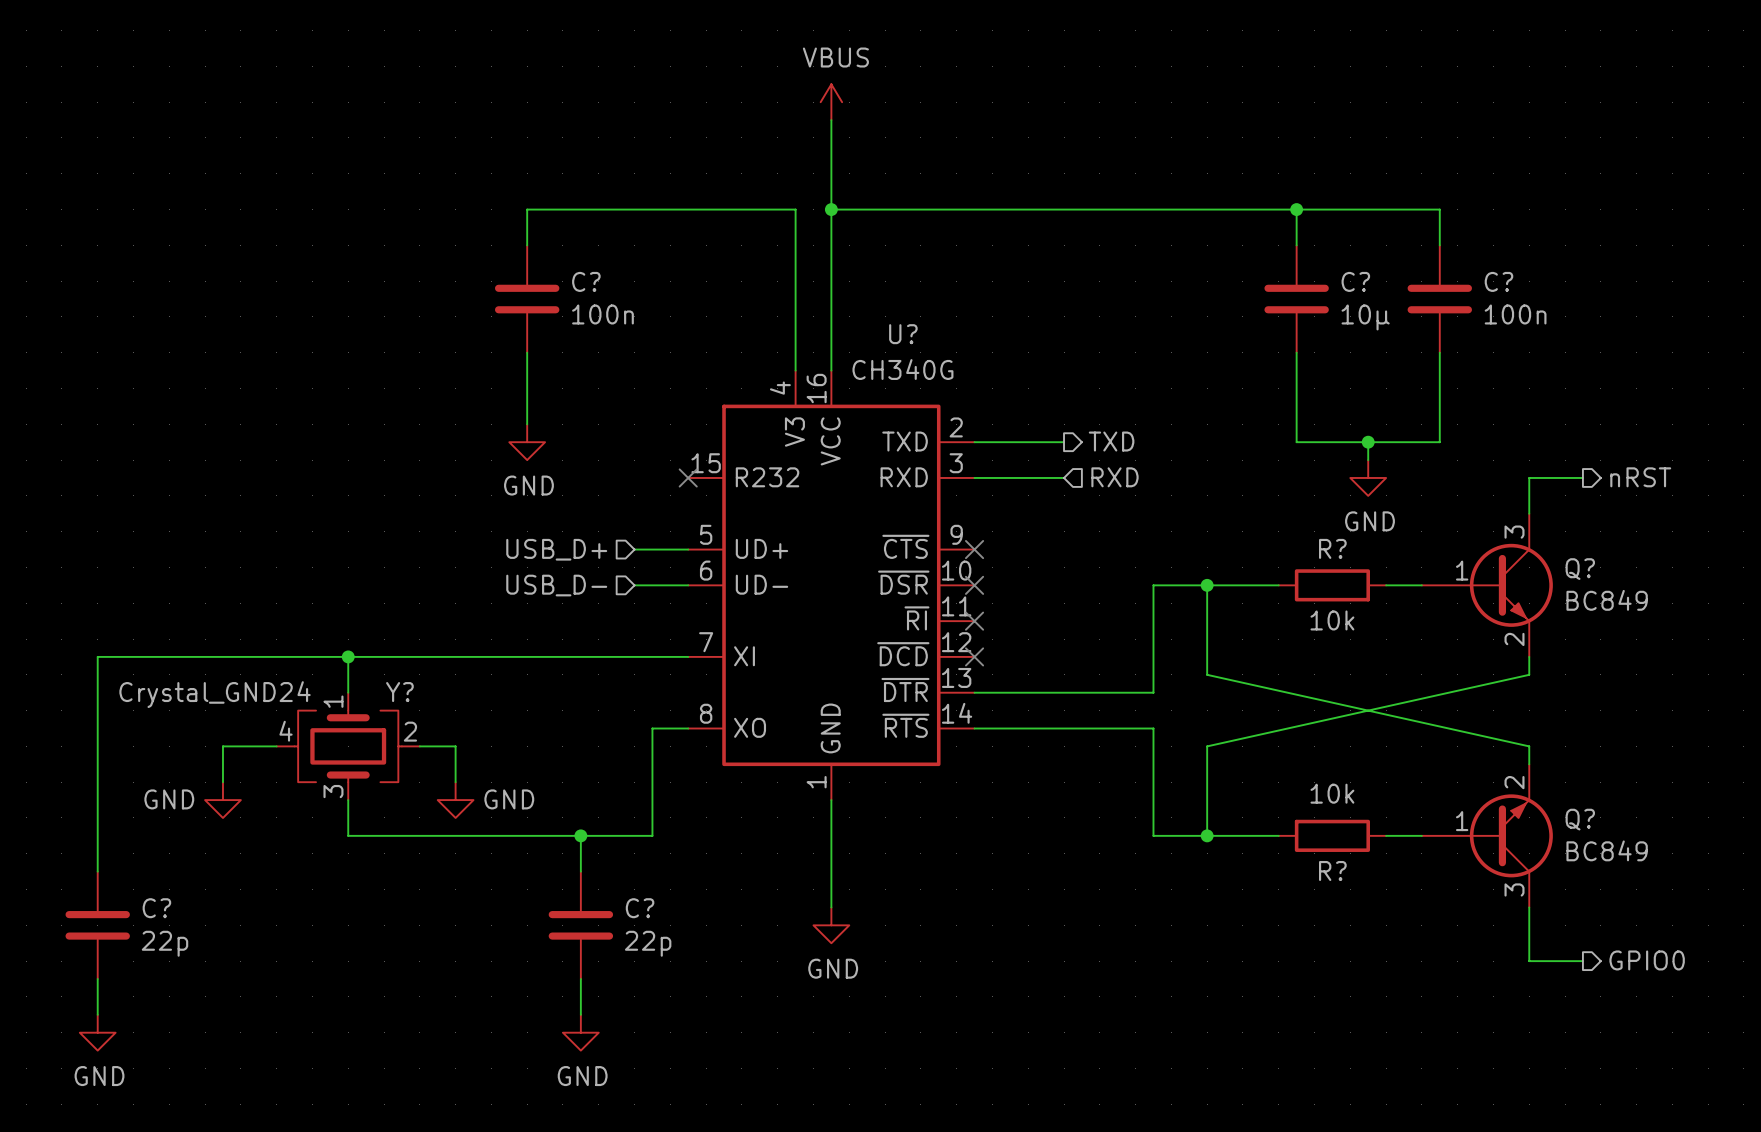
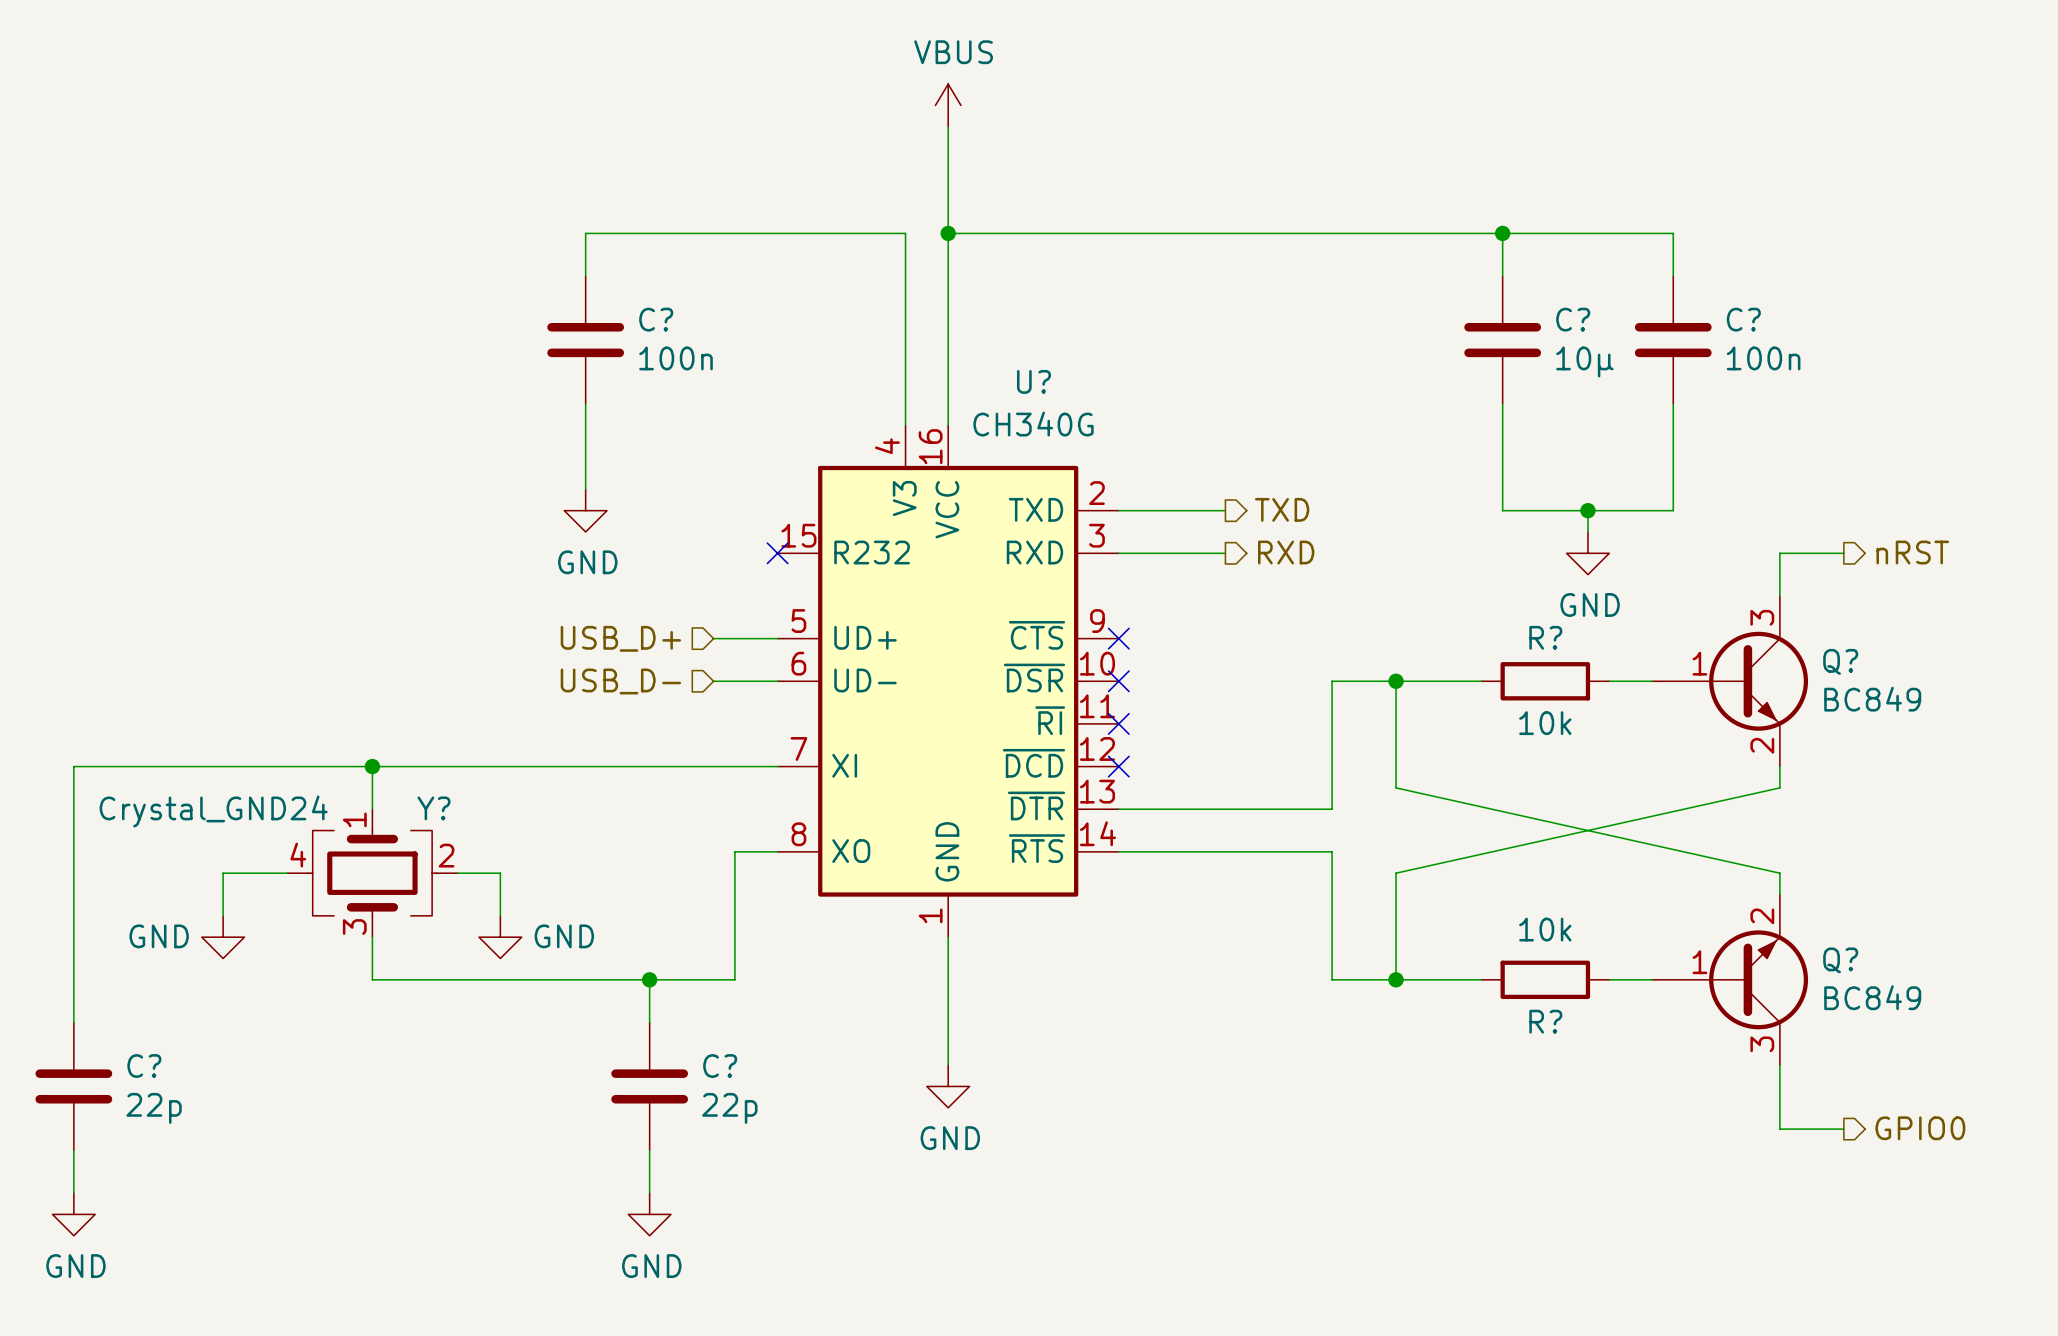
hierarchical label shape: input (1114, 477) -> output (1286, 552)

